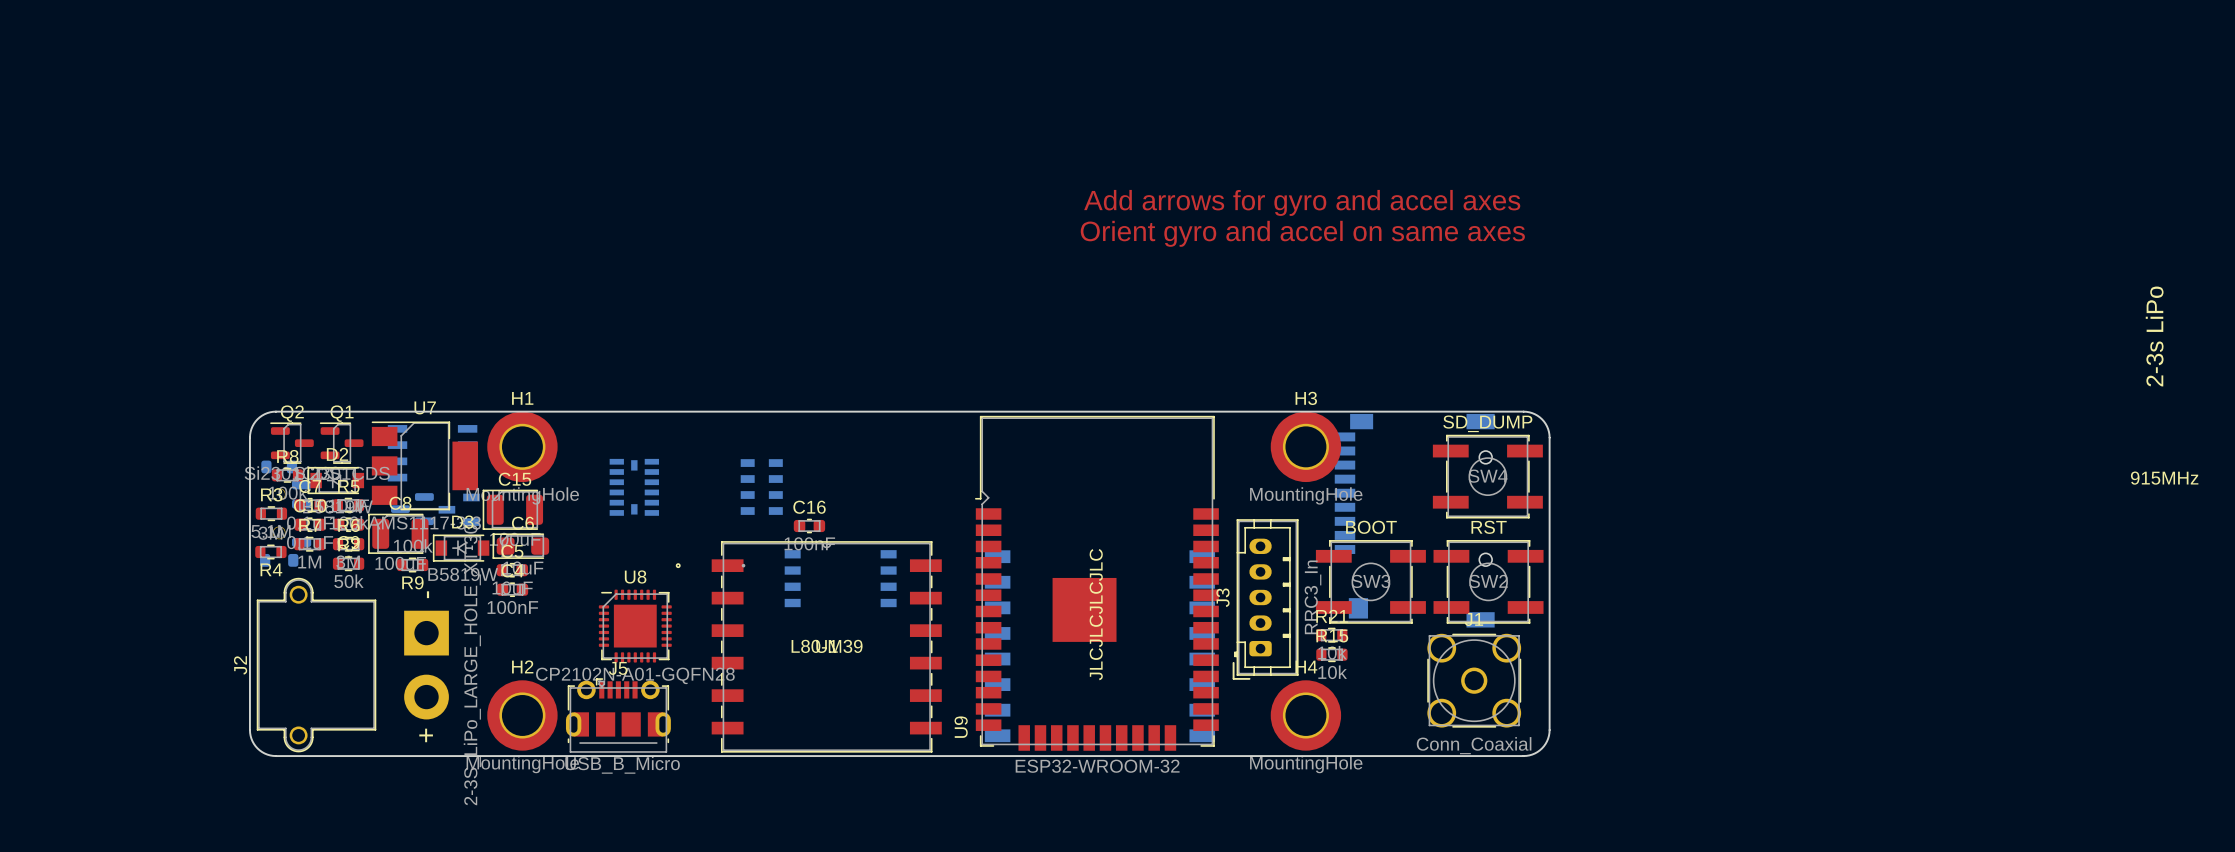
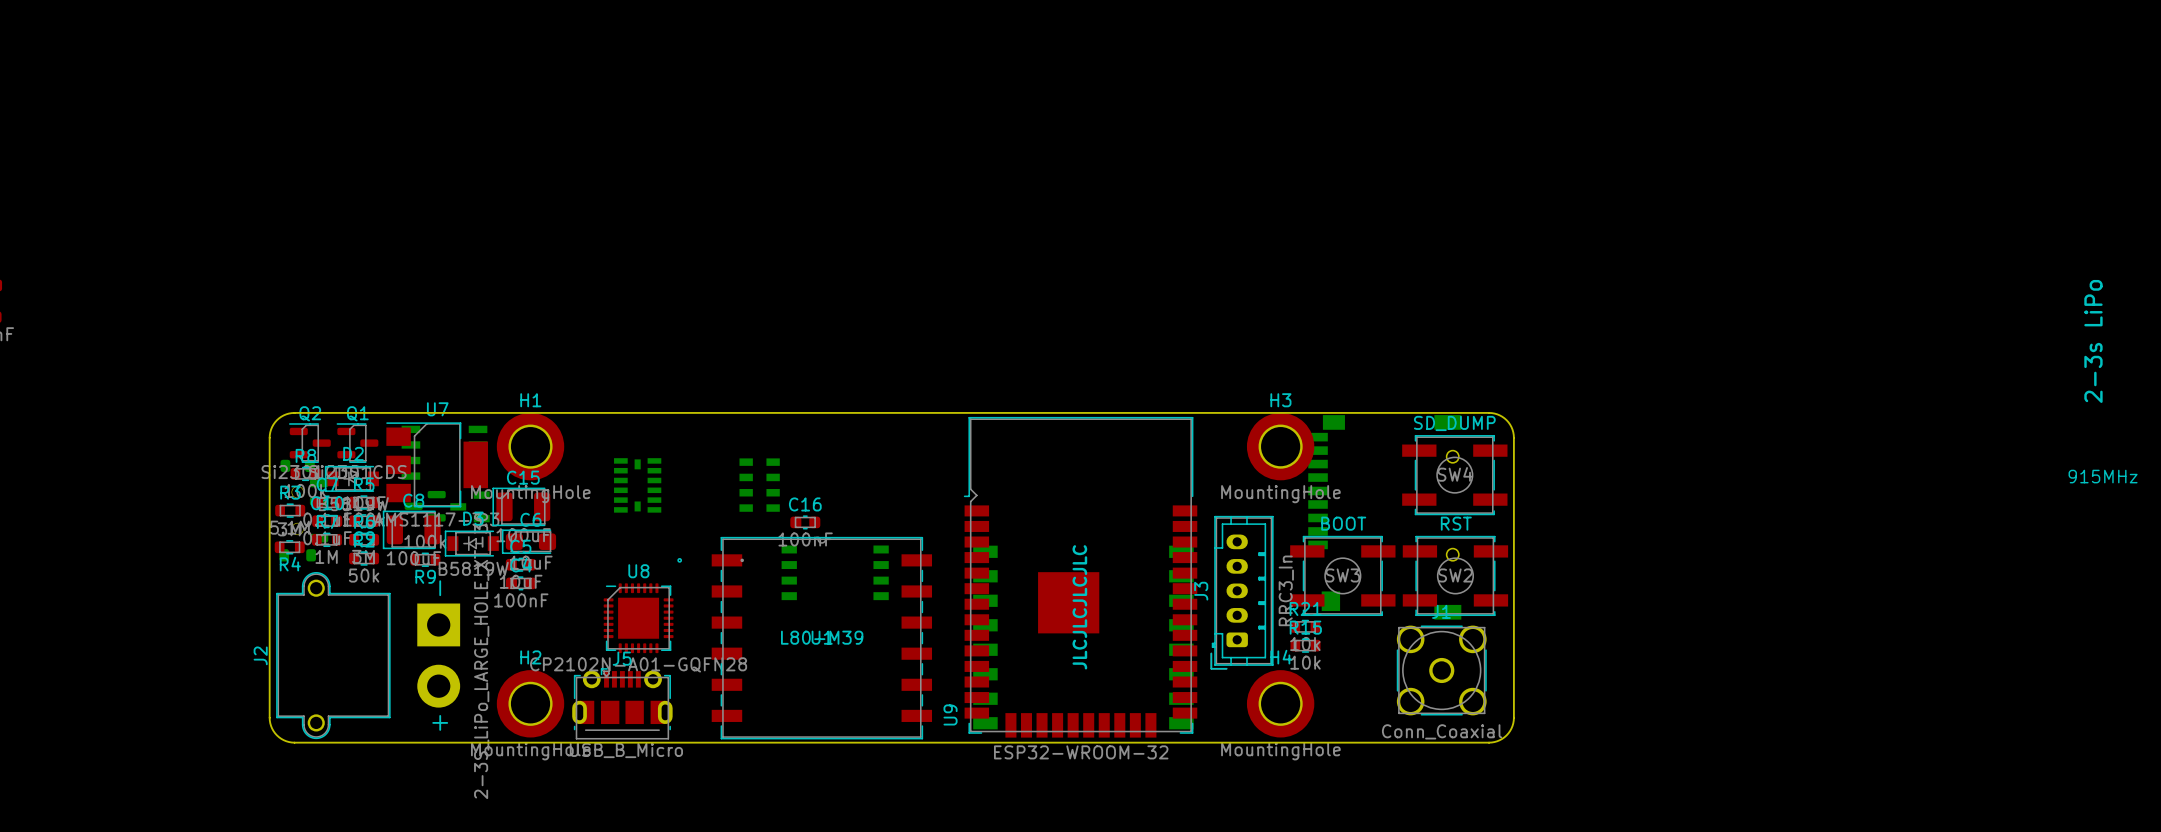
text: Add arrows for gyro and accel axes (1302, 202) -> none
text: Orient gyro and accel on same axes (1302, 233) -> none

